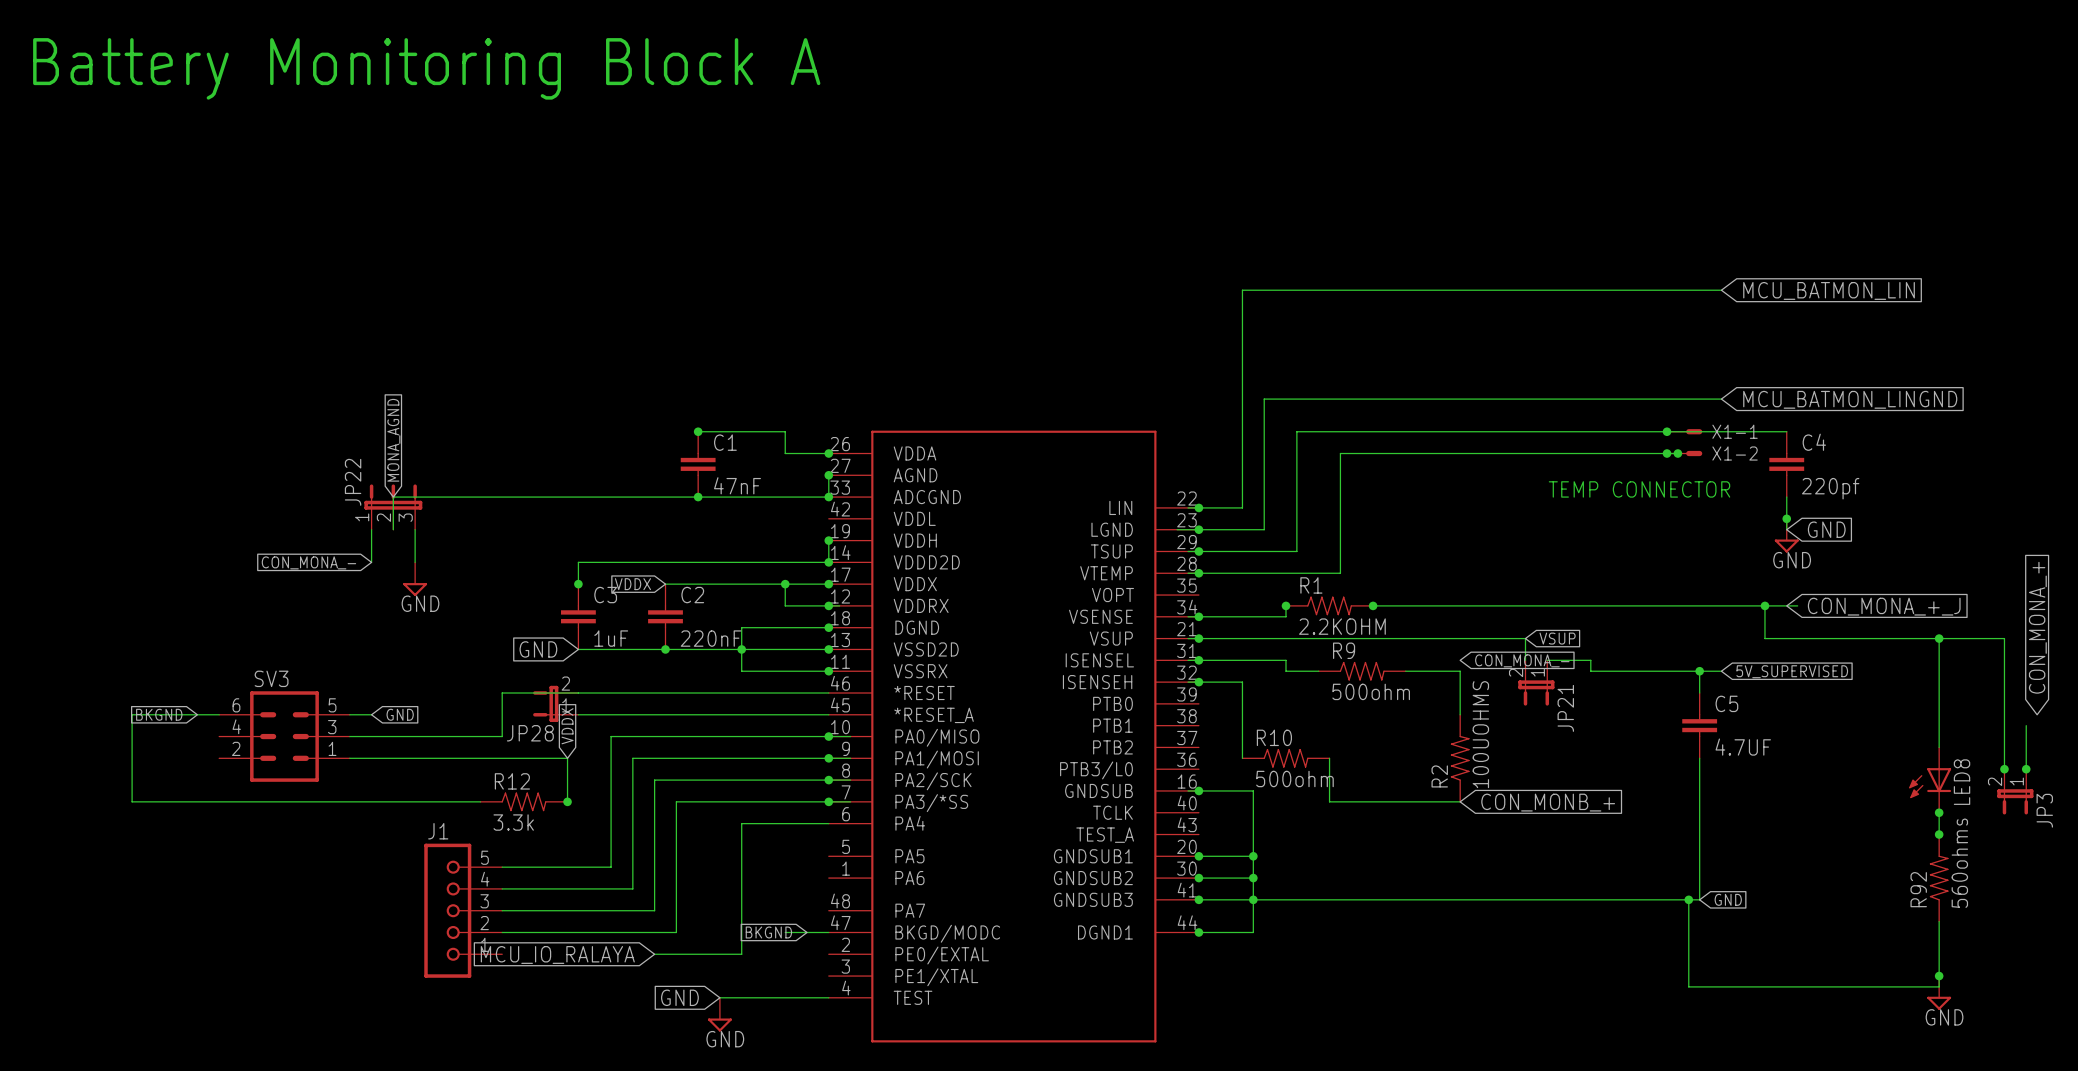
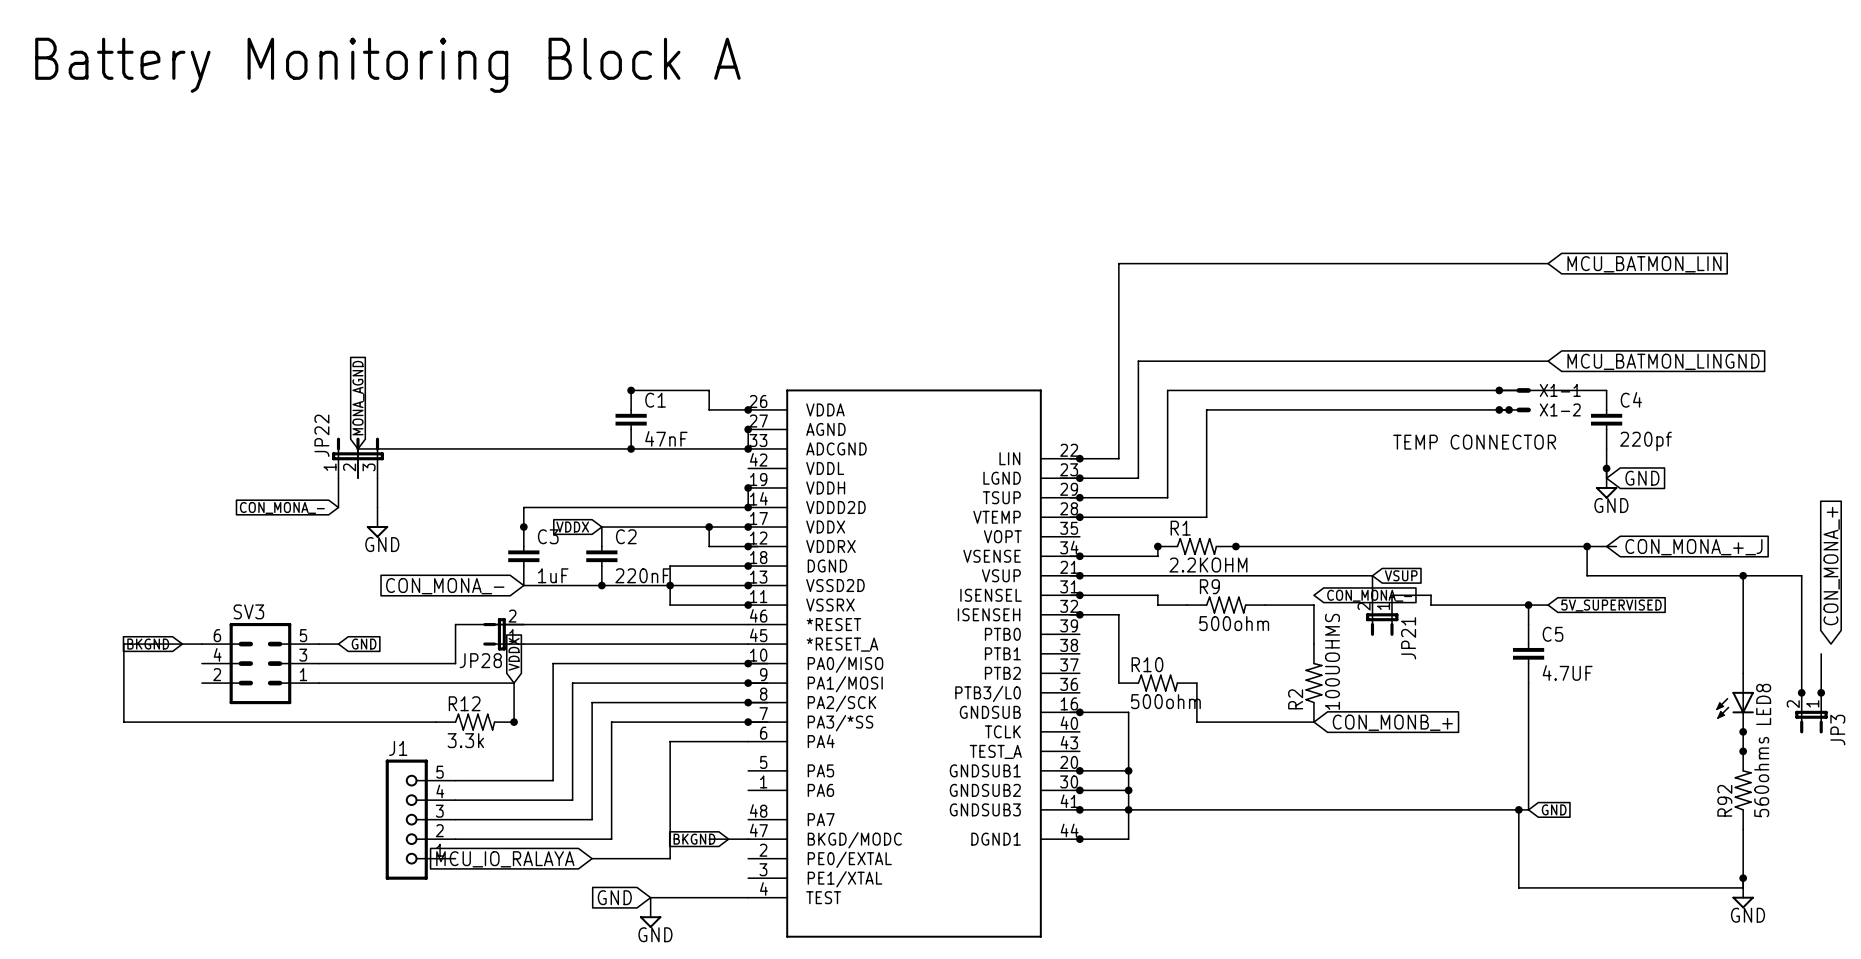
global label: GND (538, 649) -> CON_MONA_- (445, 586)

